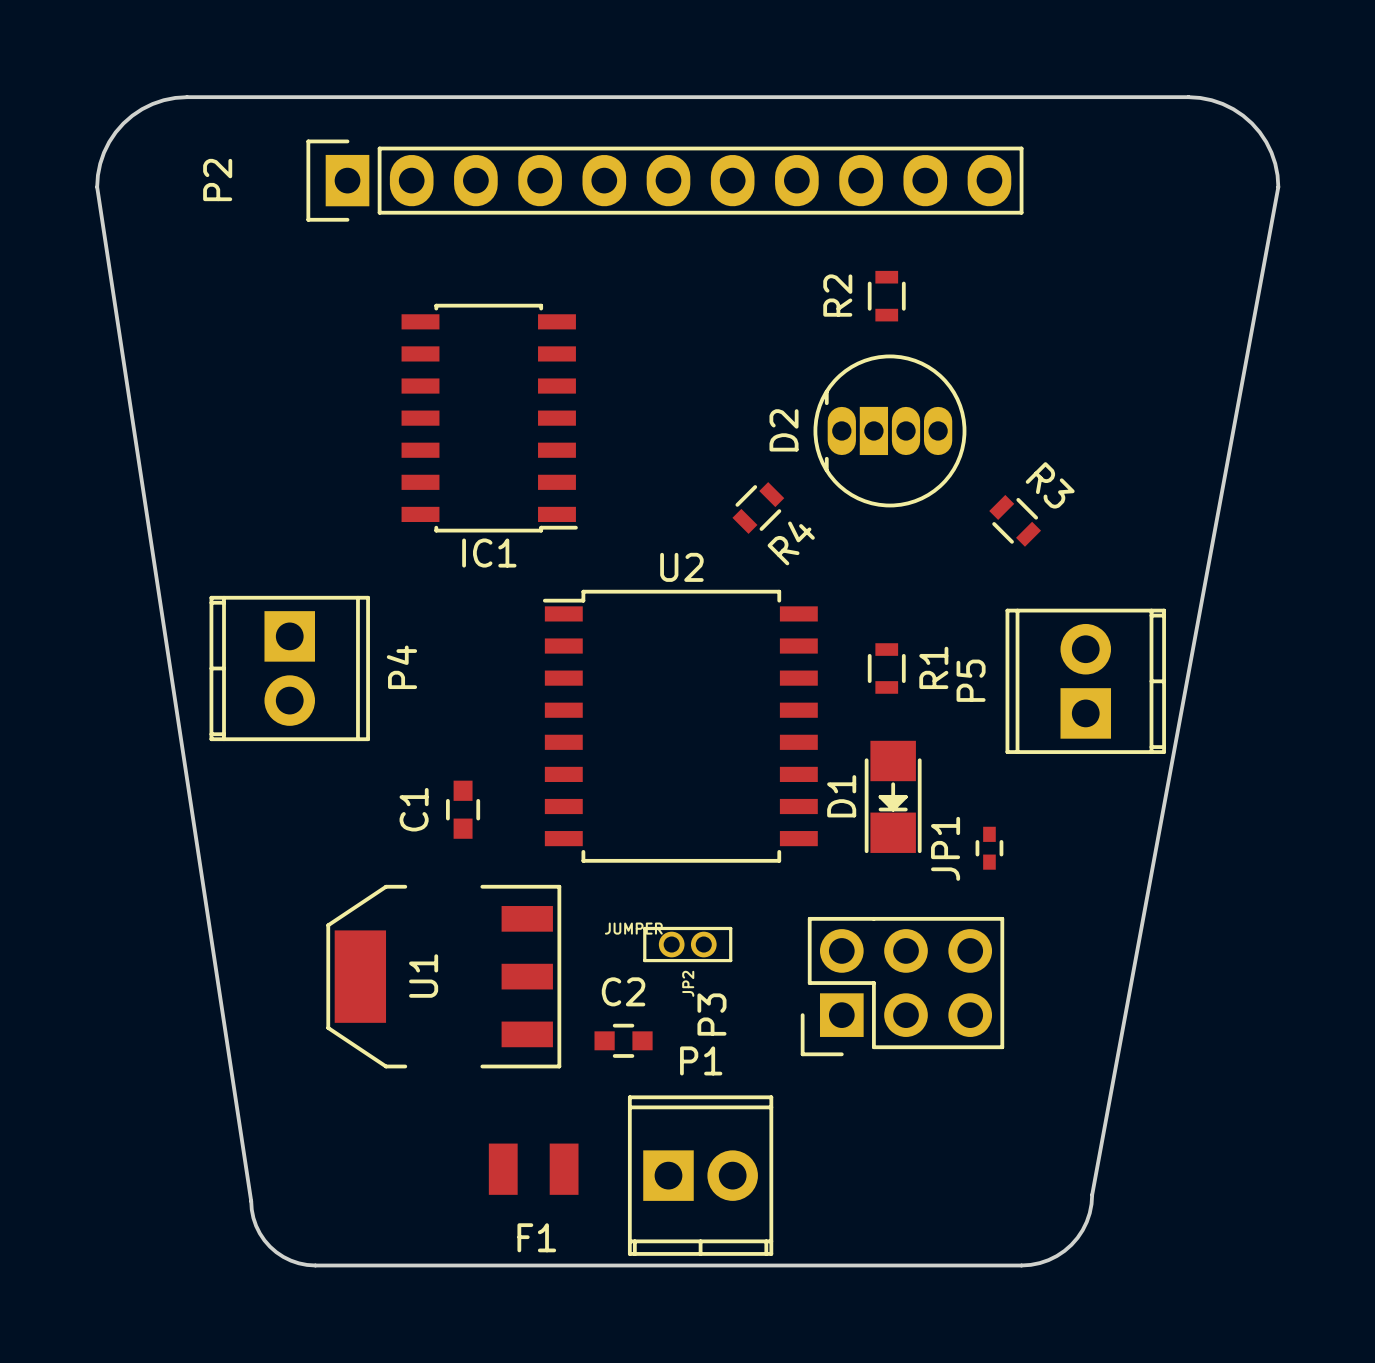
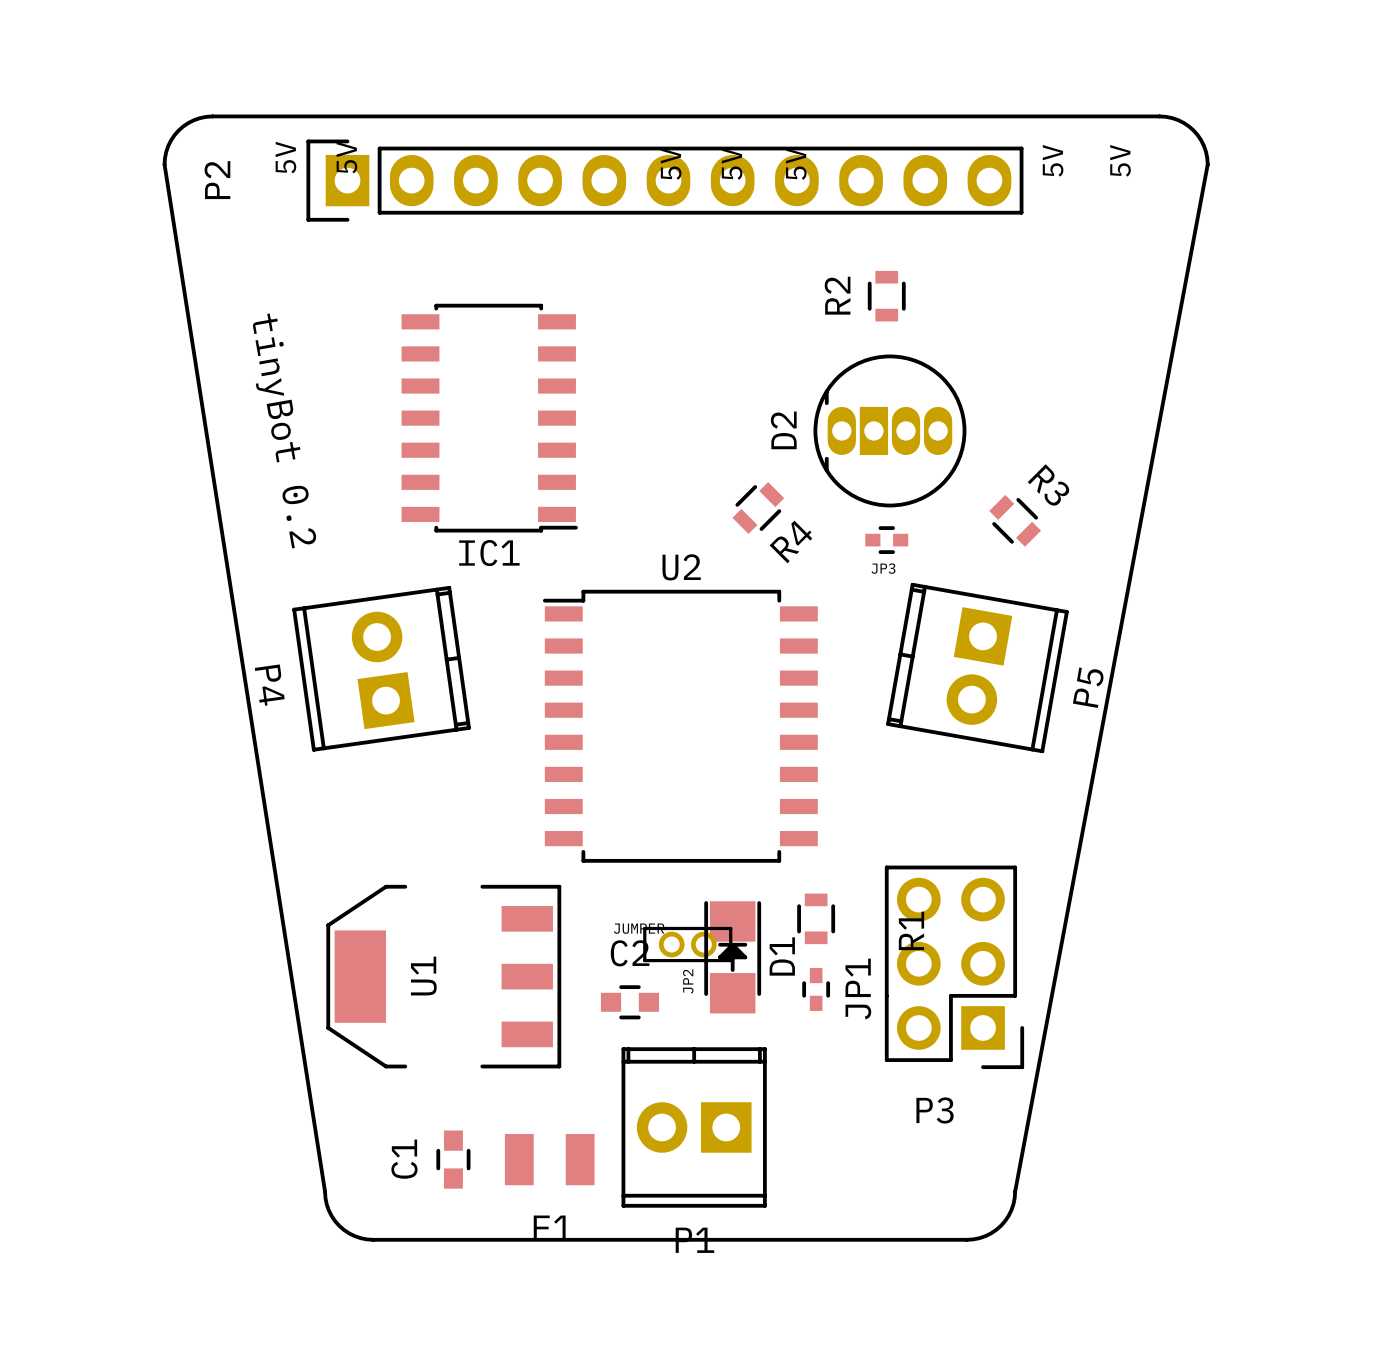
board edge: (187, 97) (1188, 97) (1200, 97) (1222, 103) (1243, 115) (1259, 132) (1271, 152) (1277, 175) (1278, 187) (1089, 1213) (1077, 1237) (1064, 1250) (1039, 1263) (1021, 1265) (315, 1265) (290, 1260) (276, 1252) (264, 1240) (256, 1225) (251, 1209) (97, 187) (100, 163) (103, 152) (115, 132) (123, 123) (142, 109) (152, 103) (175, 97) (187, 97) -> (212, 116) (1159, 116) (1178, 120) (1188, 126) (1197, 135) (1204, 146) (1207, 164) (1014, 1197) (1008, 1215) (996, 1229) (979, 1238) (966, 1239) (373, 1239) (354, 1236) (343, 1229) (334, 1220) (328, 1210) (325, 1197) (164, 164) (168, 146) (178, 130) (194, 120) (212, 116)
text: none -> 5V (285, 157)
text: none -> 5V (346, 157)
text: none -> 5V (1053, 160)
text: none -> 5V (1120, 160)
text: none -> 5V (671, 164)
text: none -> 5V (732, 164)
text: none -> 5V (796, 164)
text: none -> tinyBot 0.2 (284, 430)
JP3: none -> (886, 540)
R1 name position: R1 (933, 667) -> R1 (911, 930)
P4 rotation: 0° (289, 668) -> 172° clockwise (381, 668)
R1 position: (886, 668) -> (816, 918)
P5 rotation: 0° (1085, 681) -> 170° counterclockwise (977, 668)
P5 position: (1085, 681) -> (977, 668)
D1 rotation: 0° (893, 796) -> 180° (732, 957)
D1 position: (893, 796) -> (732, 957)
C1 position: (463, 809) -> (453, 1159)
JP1 name position: JP1 (945, 848) -> JP1 (858, 988)
JP1 position: (989, 848) -> (816, 989)
P3 rotation: 0° (902, 986) -> 90° counterclockwise (954, 967)
P3 name position: P3 (711, 1014) -> P3 (935, 1110)
C2 position: (623, 1040) -> (629, 1002)
F1 position: (533, 1169) -> (549, 1159)
P1 rotation: 0° (700, 1175) -> 180° (694, 1127)

